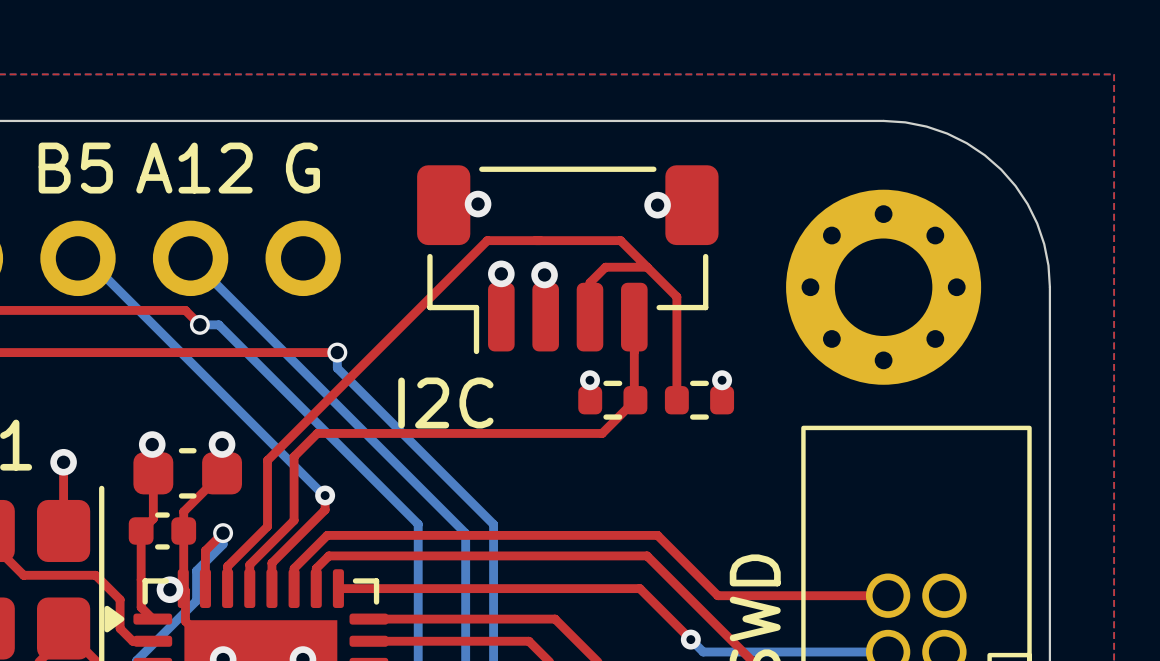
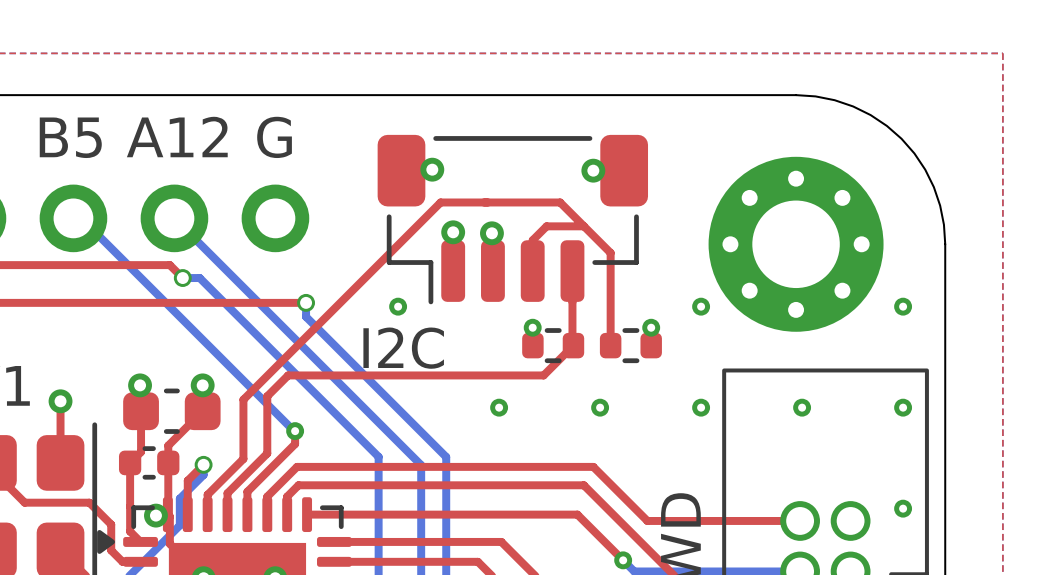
via: none -> (398, 306)
via: none -> (701, 306)
via: none -> (903, 306)
via: none -> (499, 407)
via: none -> (600, 407)
via: none -> (701, 407)
via: none -> (802, 407)
via: none -> (903, 407)
via: none -> (903, 508)

